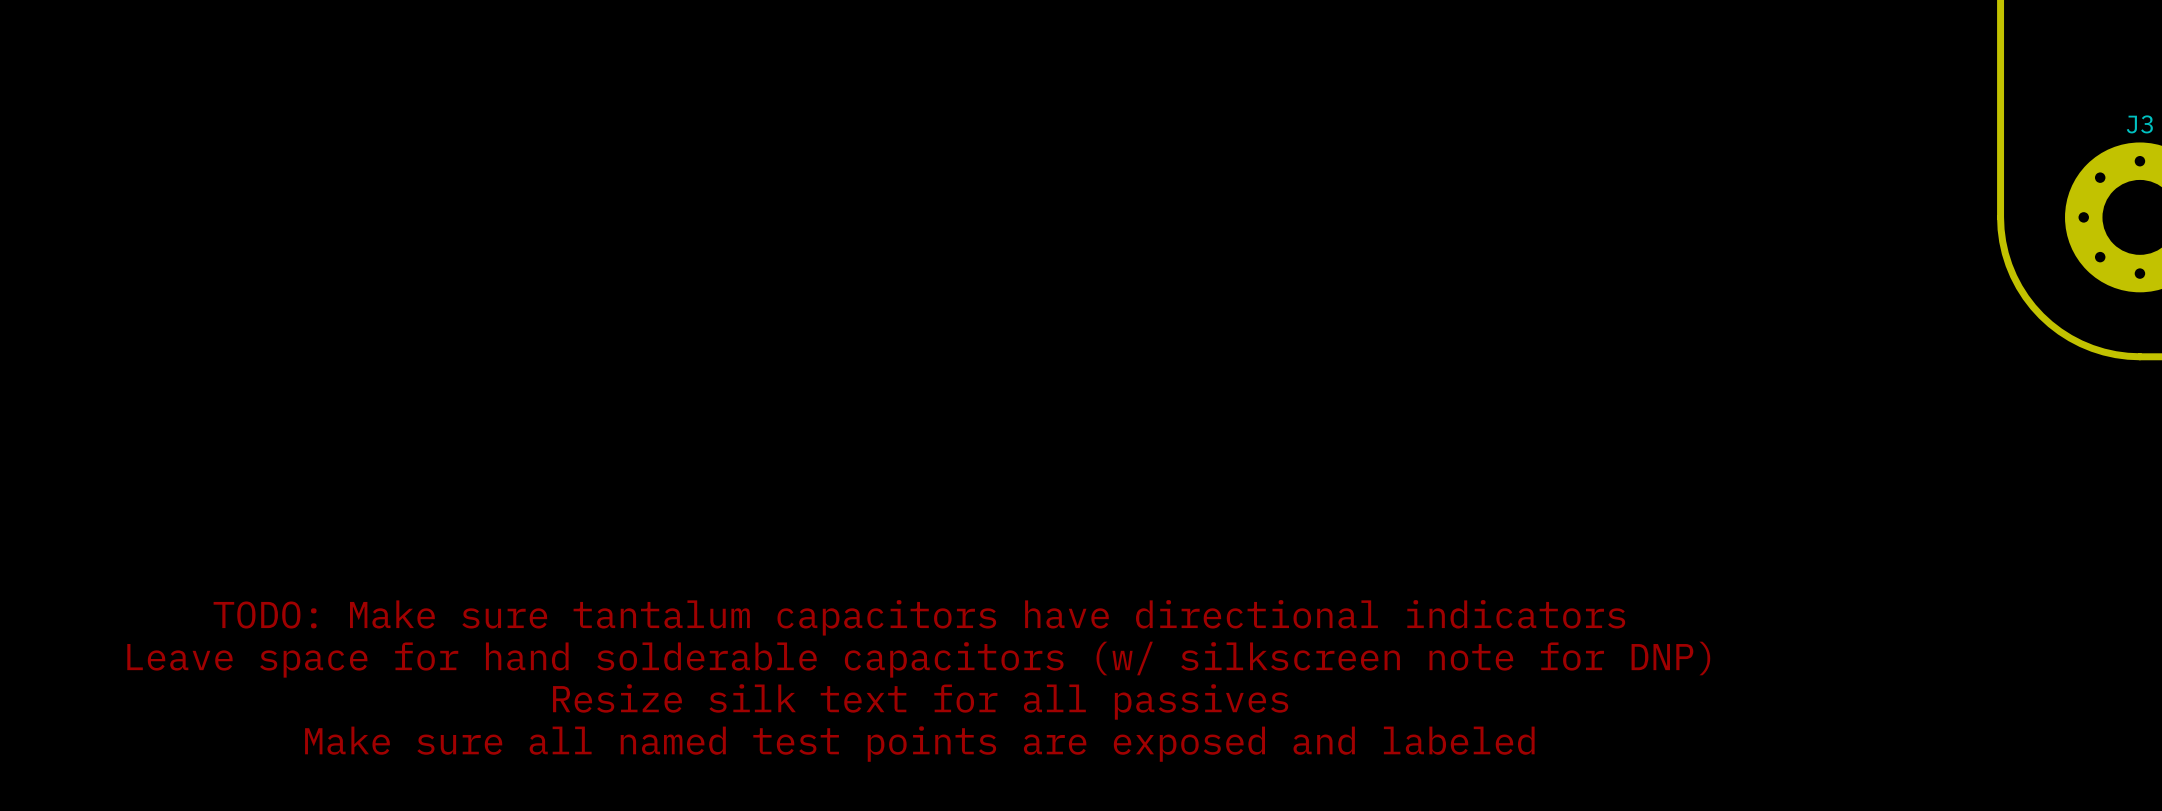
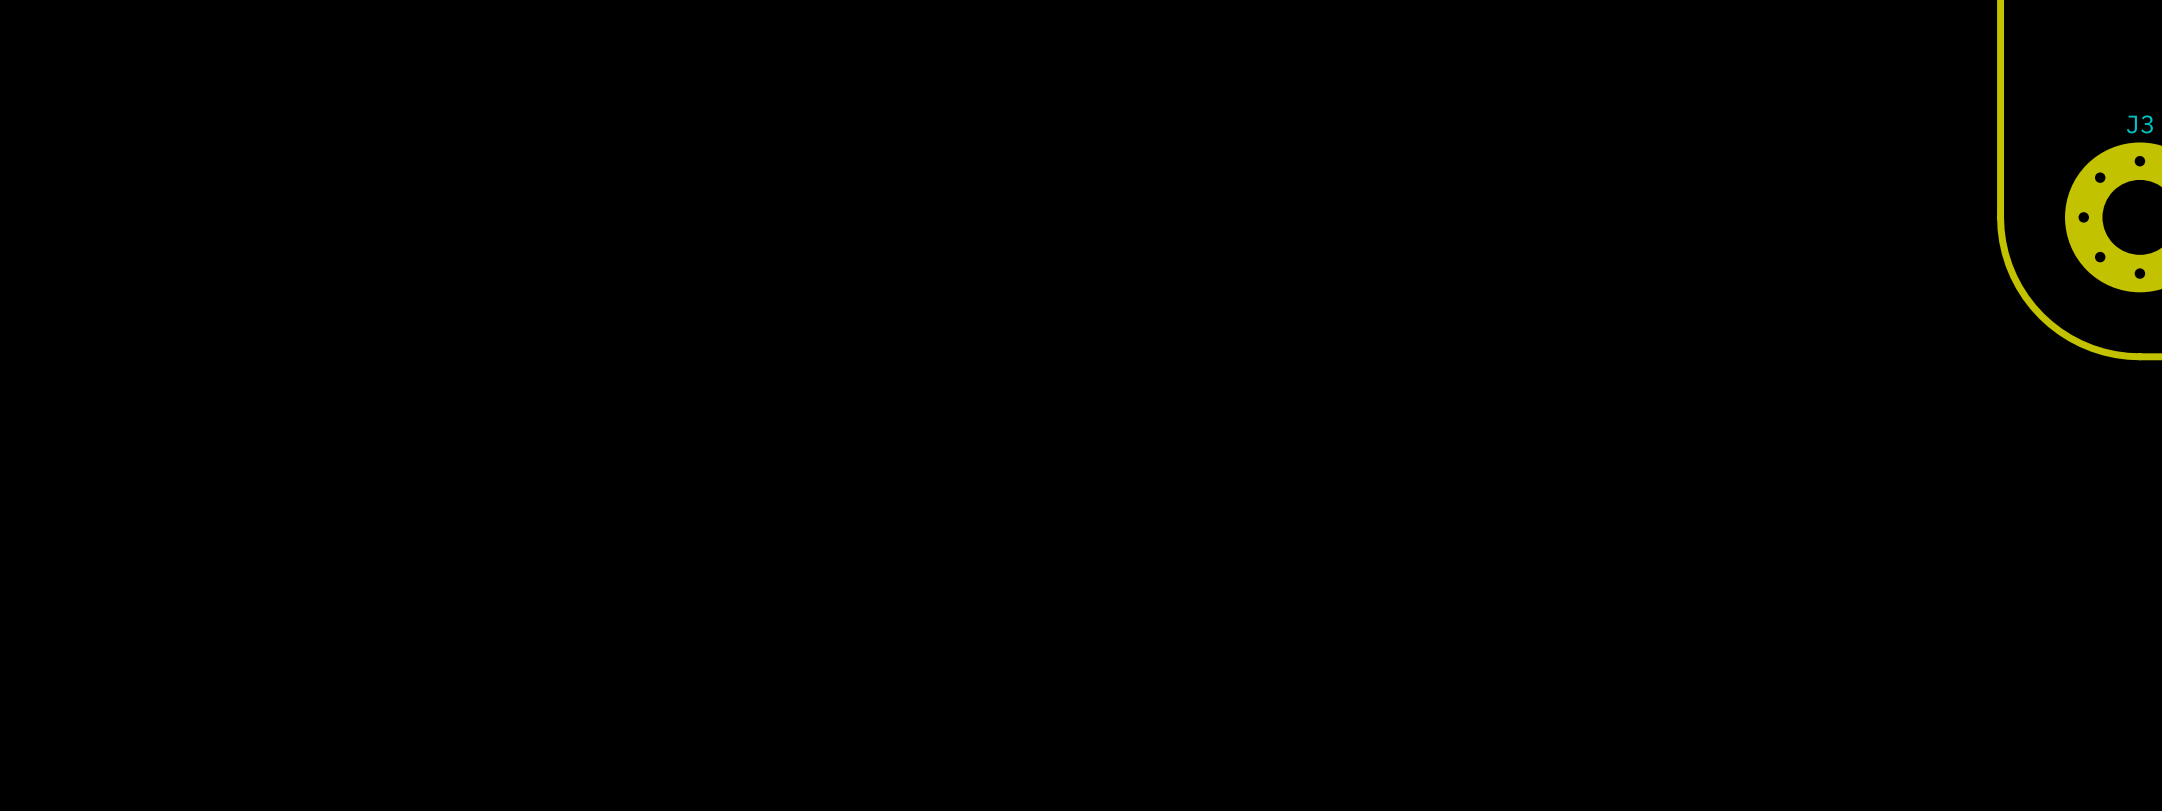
text: TODO: Make sure tantalum capacitors have directional indicators (919, 617) -> none
text: Leave space for hand solderable capacitors (w/ silkscreen note for DNP) (918, 659) -> none
text: Resize silk text for all passives (920, 701) -> none
text: Make sure all named test points are exposed and labeled (919, 744) -> none

